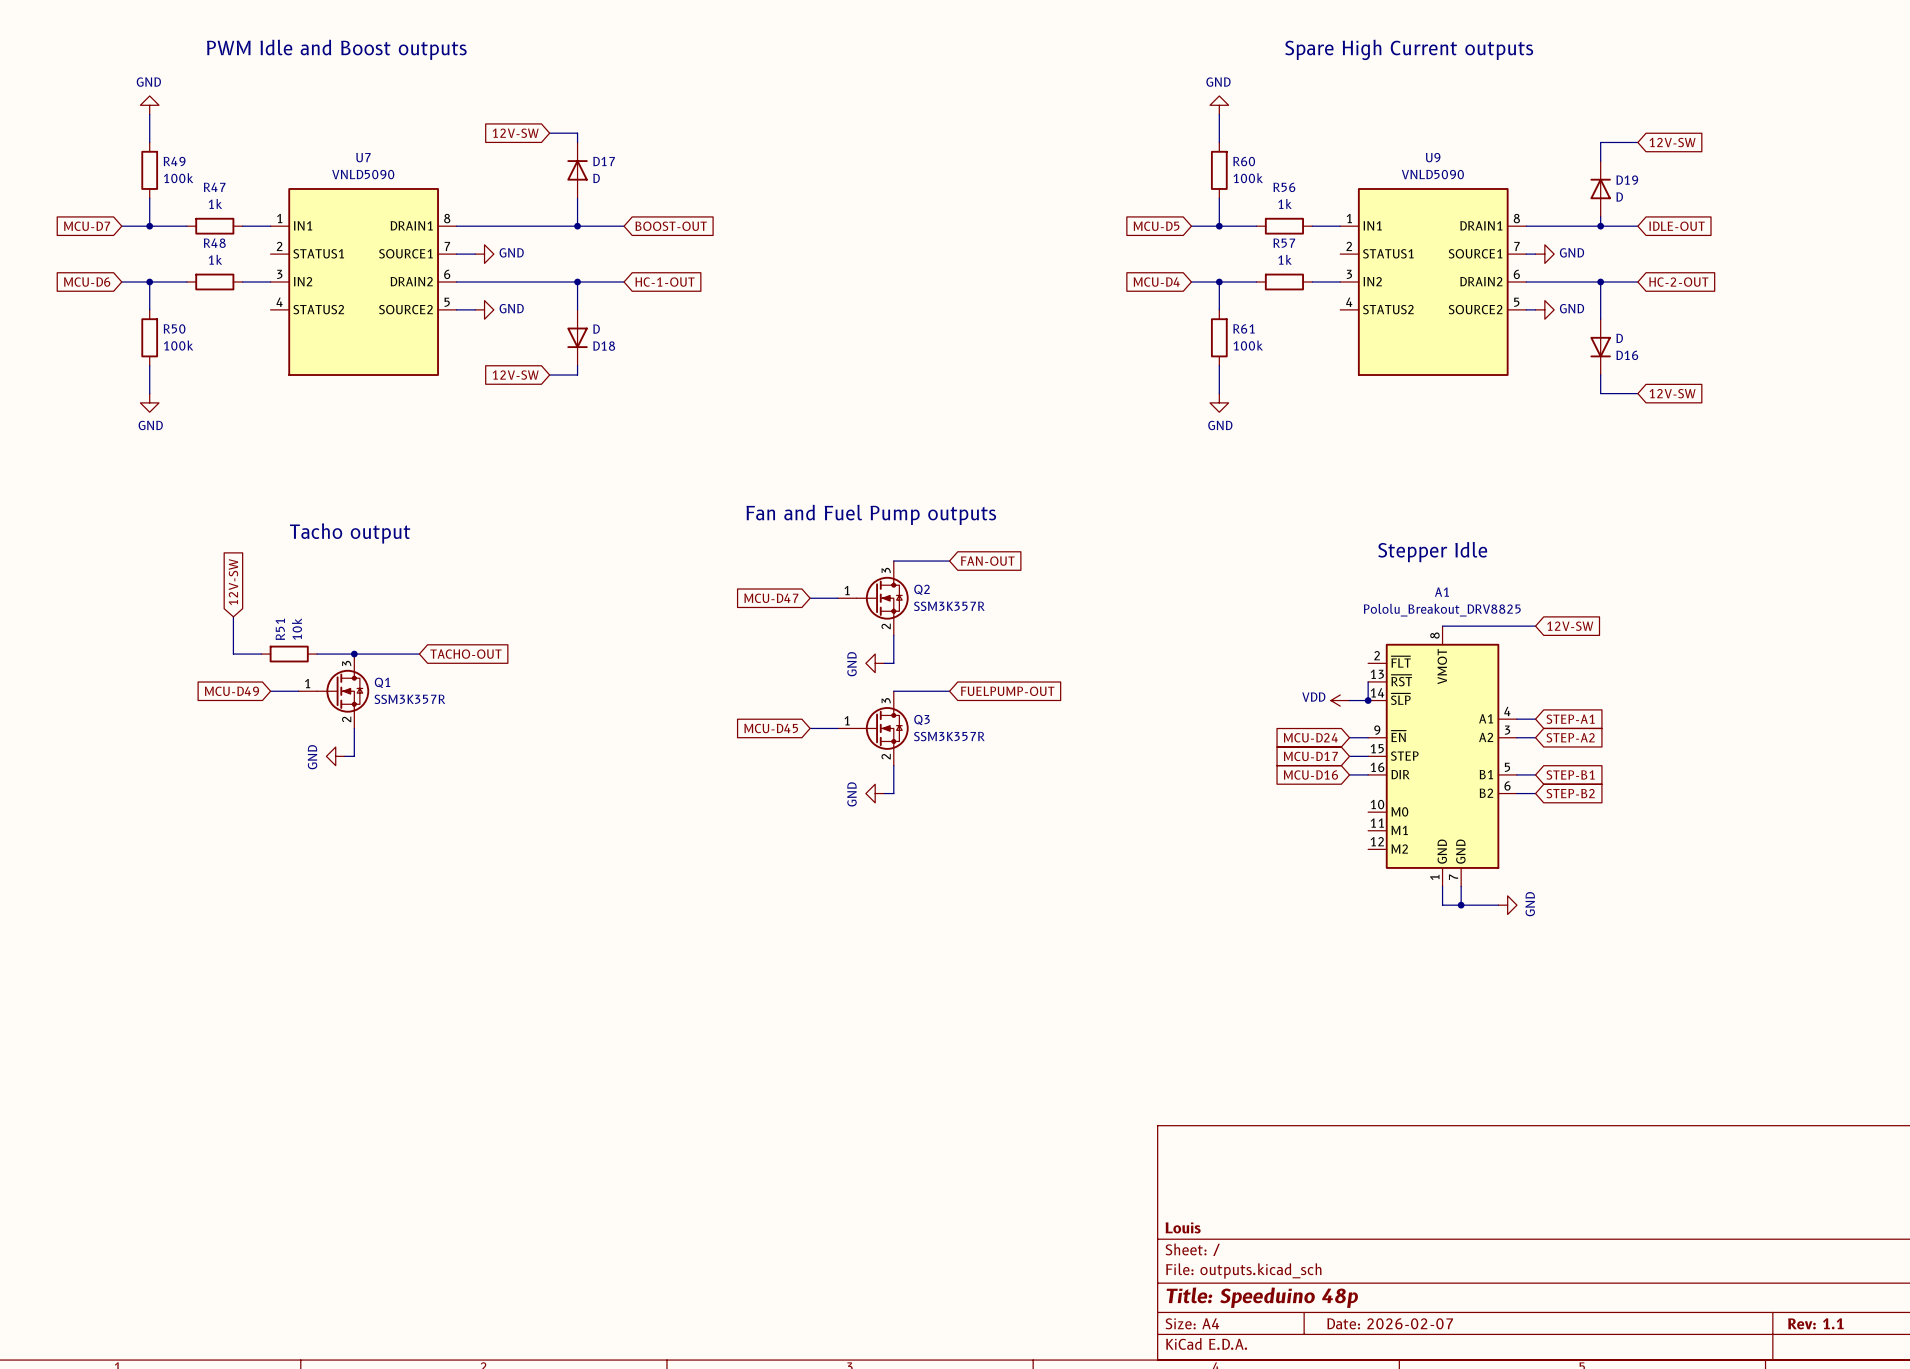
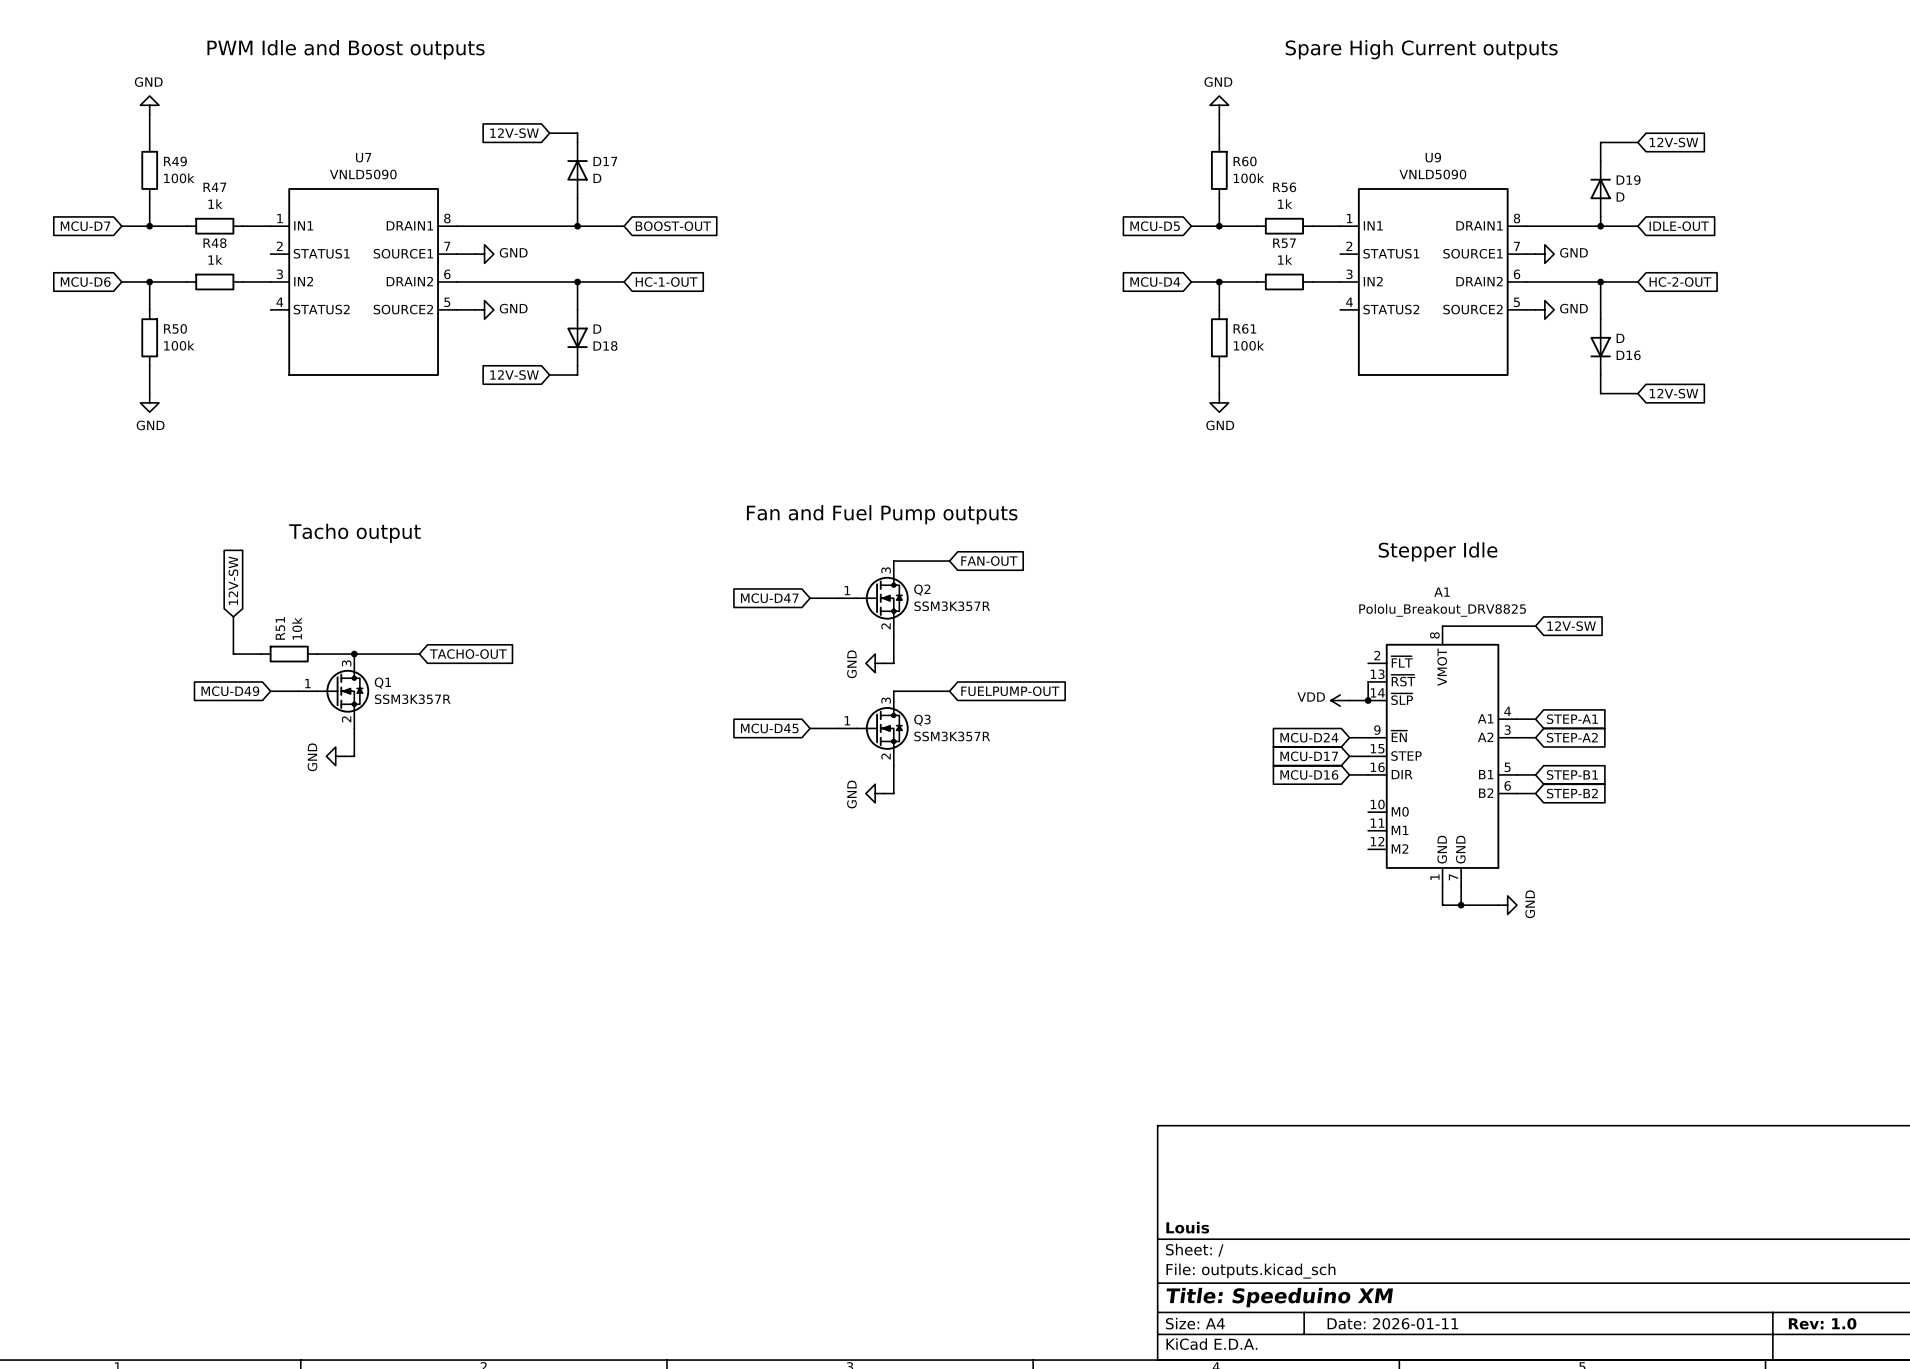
title block: Title: Speeduino 48p (1262, 1297) -> Title: Speeduino XM (1279, 1297)
title block: Date: 2026-02-07 (1390, 1323) -> Date: 2026-01-11 (1392, 1323)
title block: Rev: 1.1 (1815, 1323) -> Rev: 1.0 (1822, 1323)

